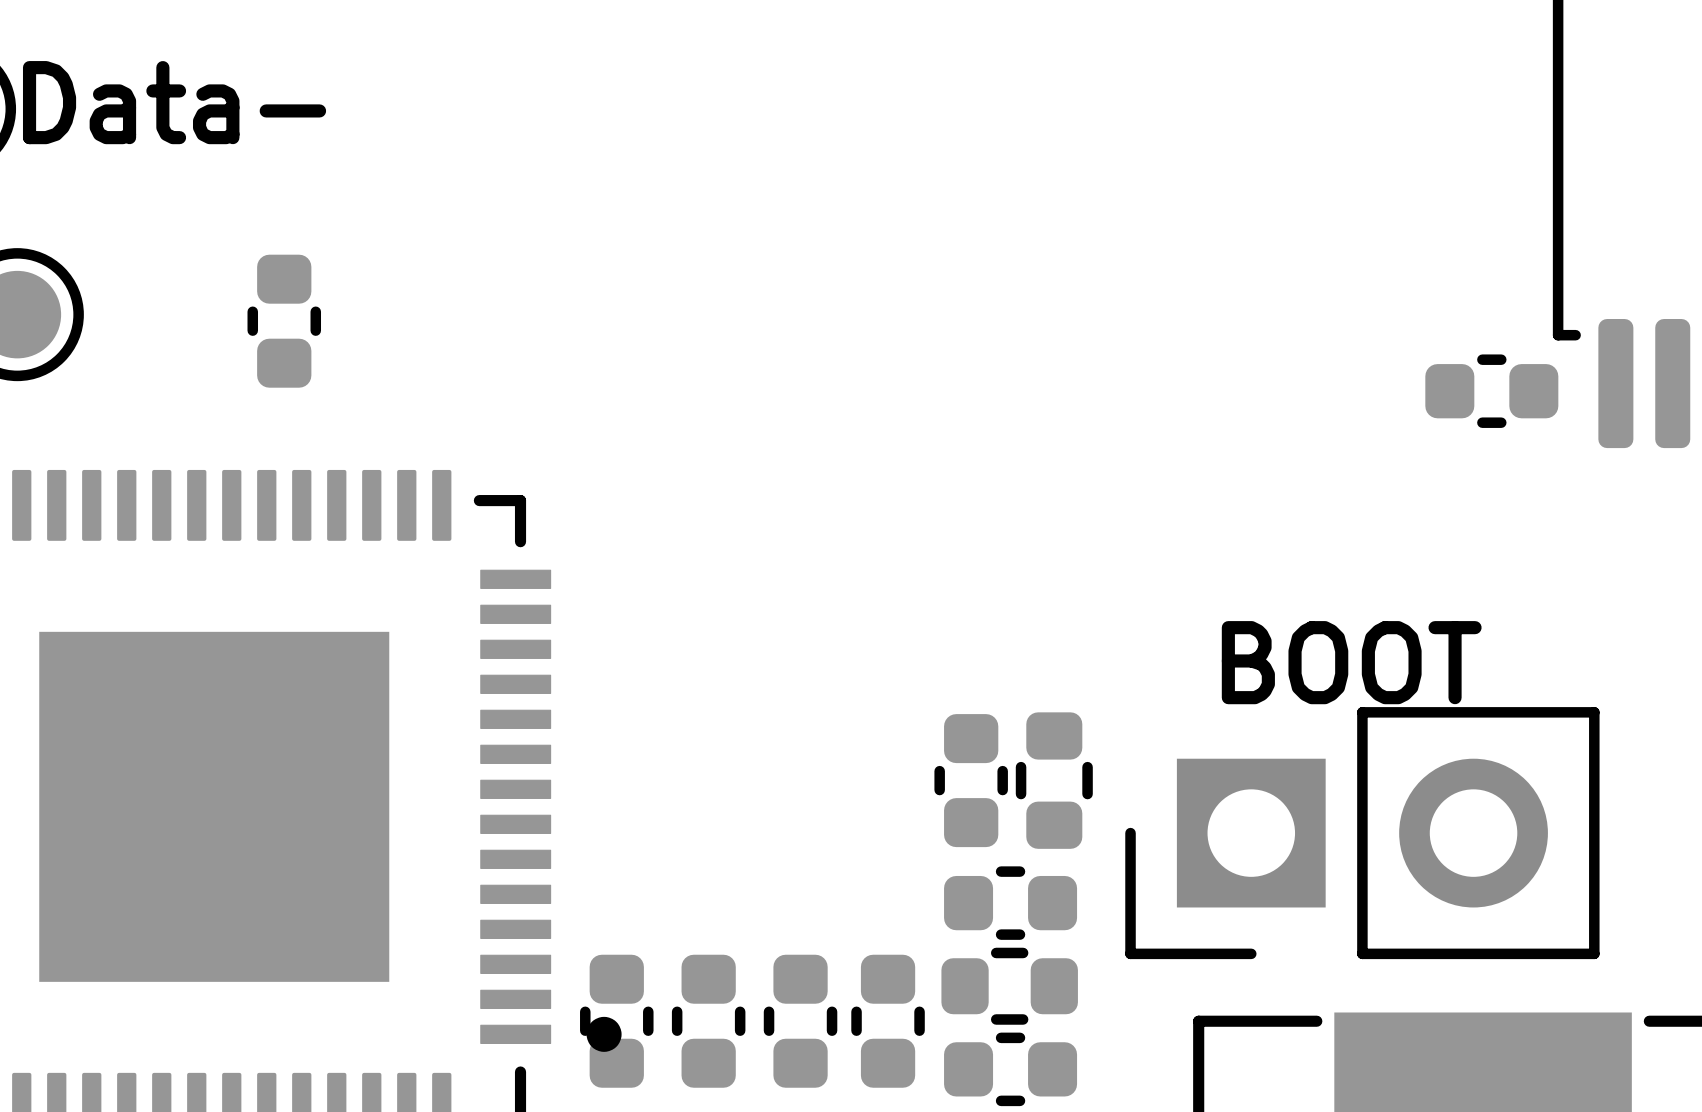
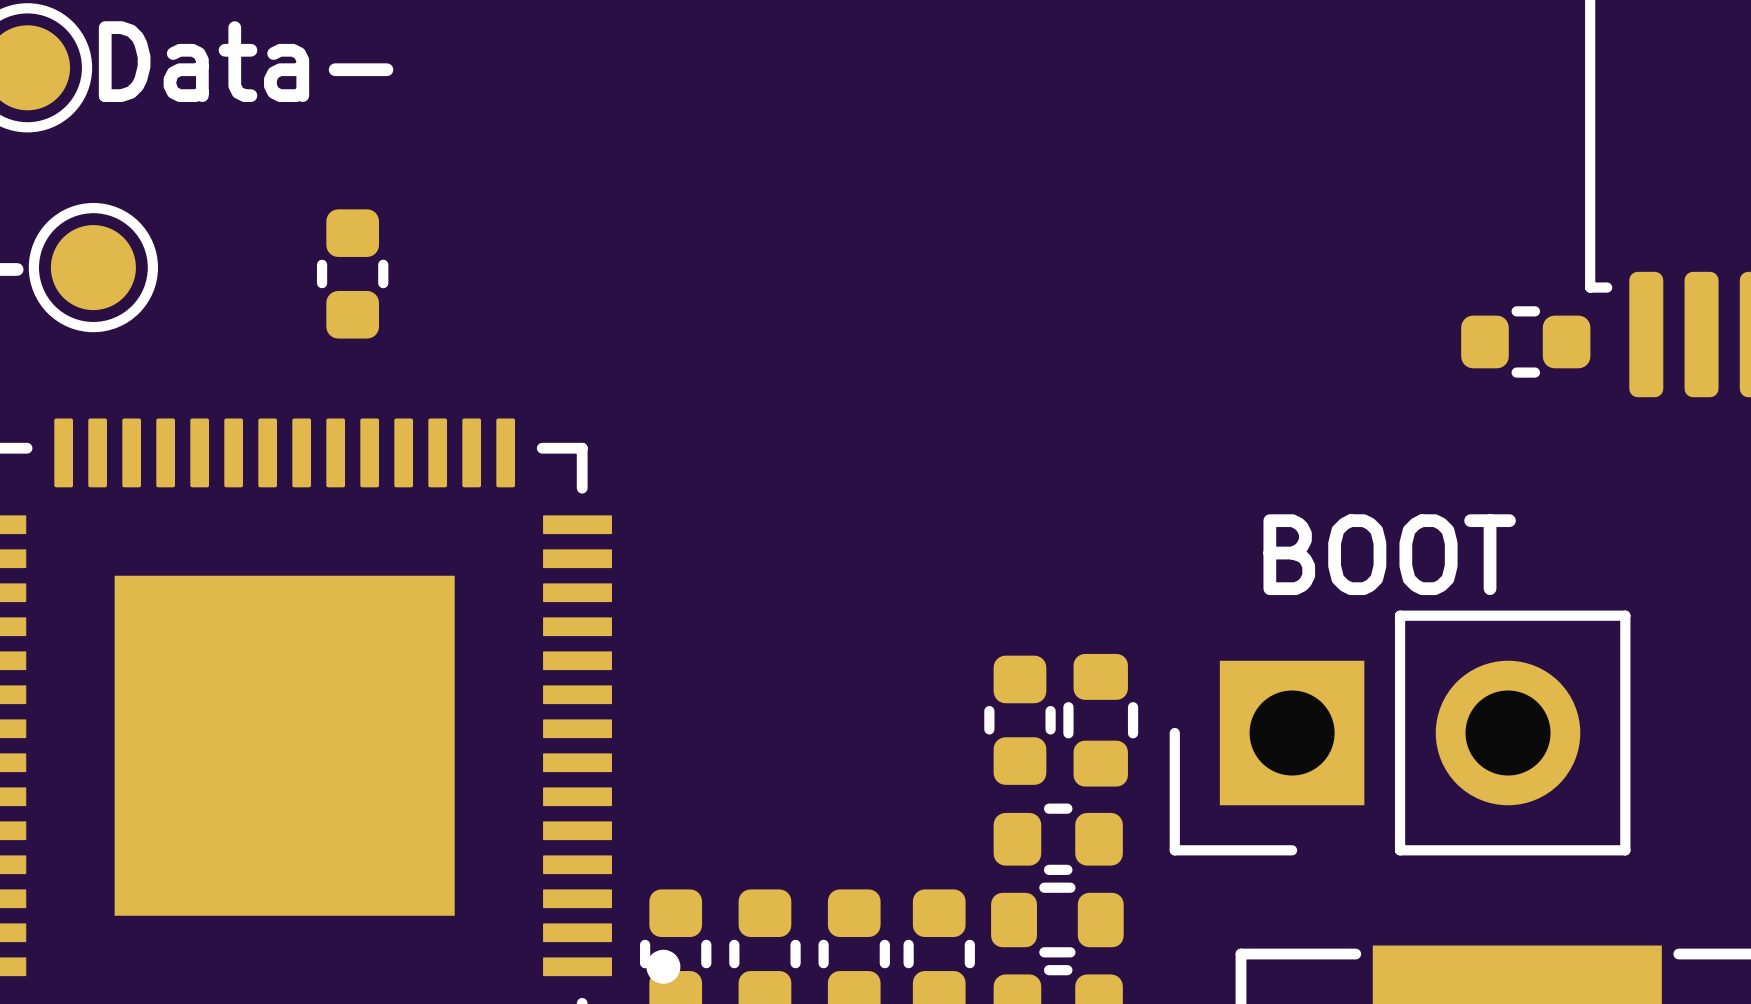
text position: BOOT (1351, 662) -> BOOT (1389, 554)
part position: (1362, 833) -> (1400, 733)

